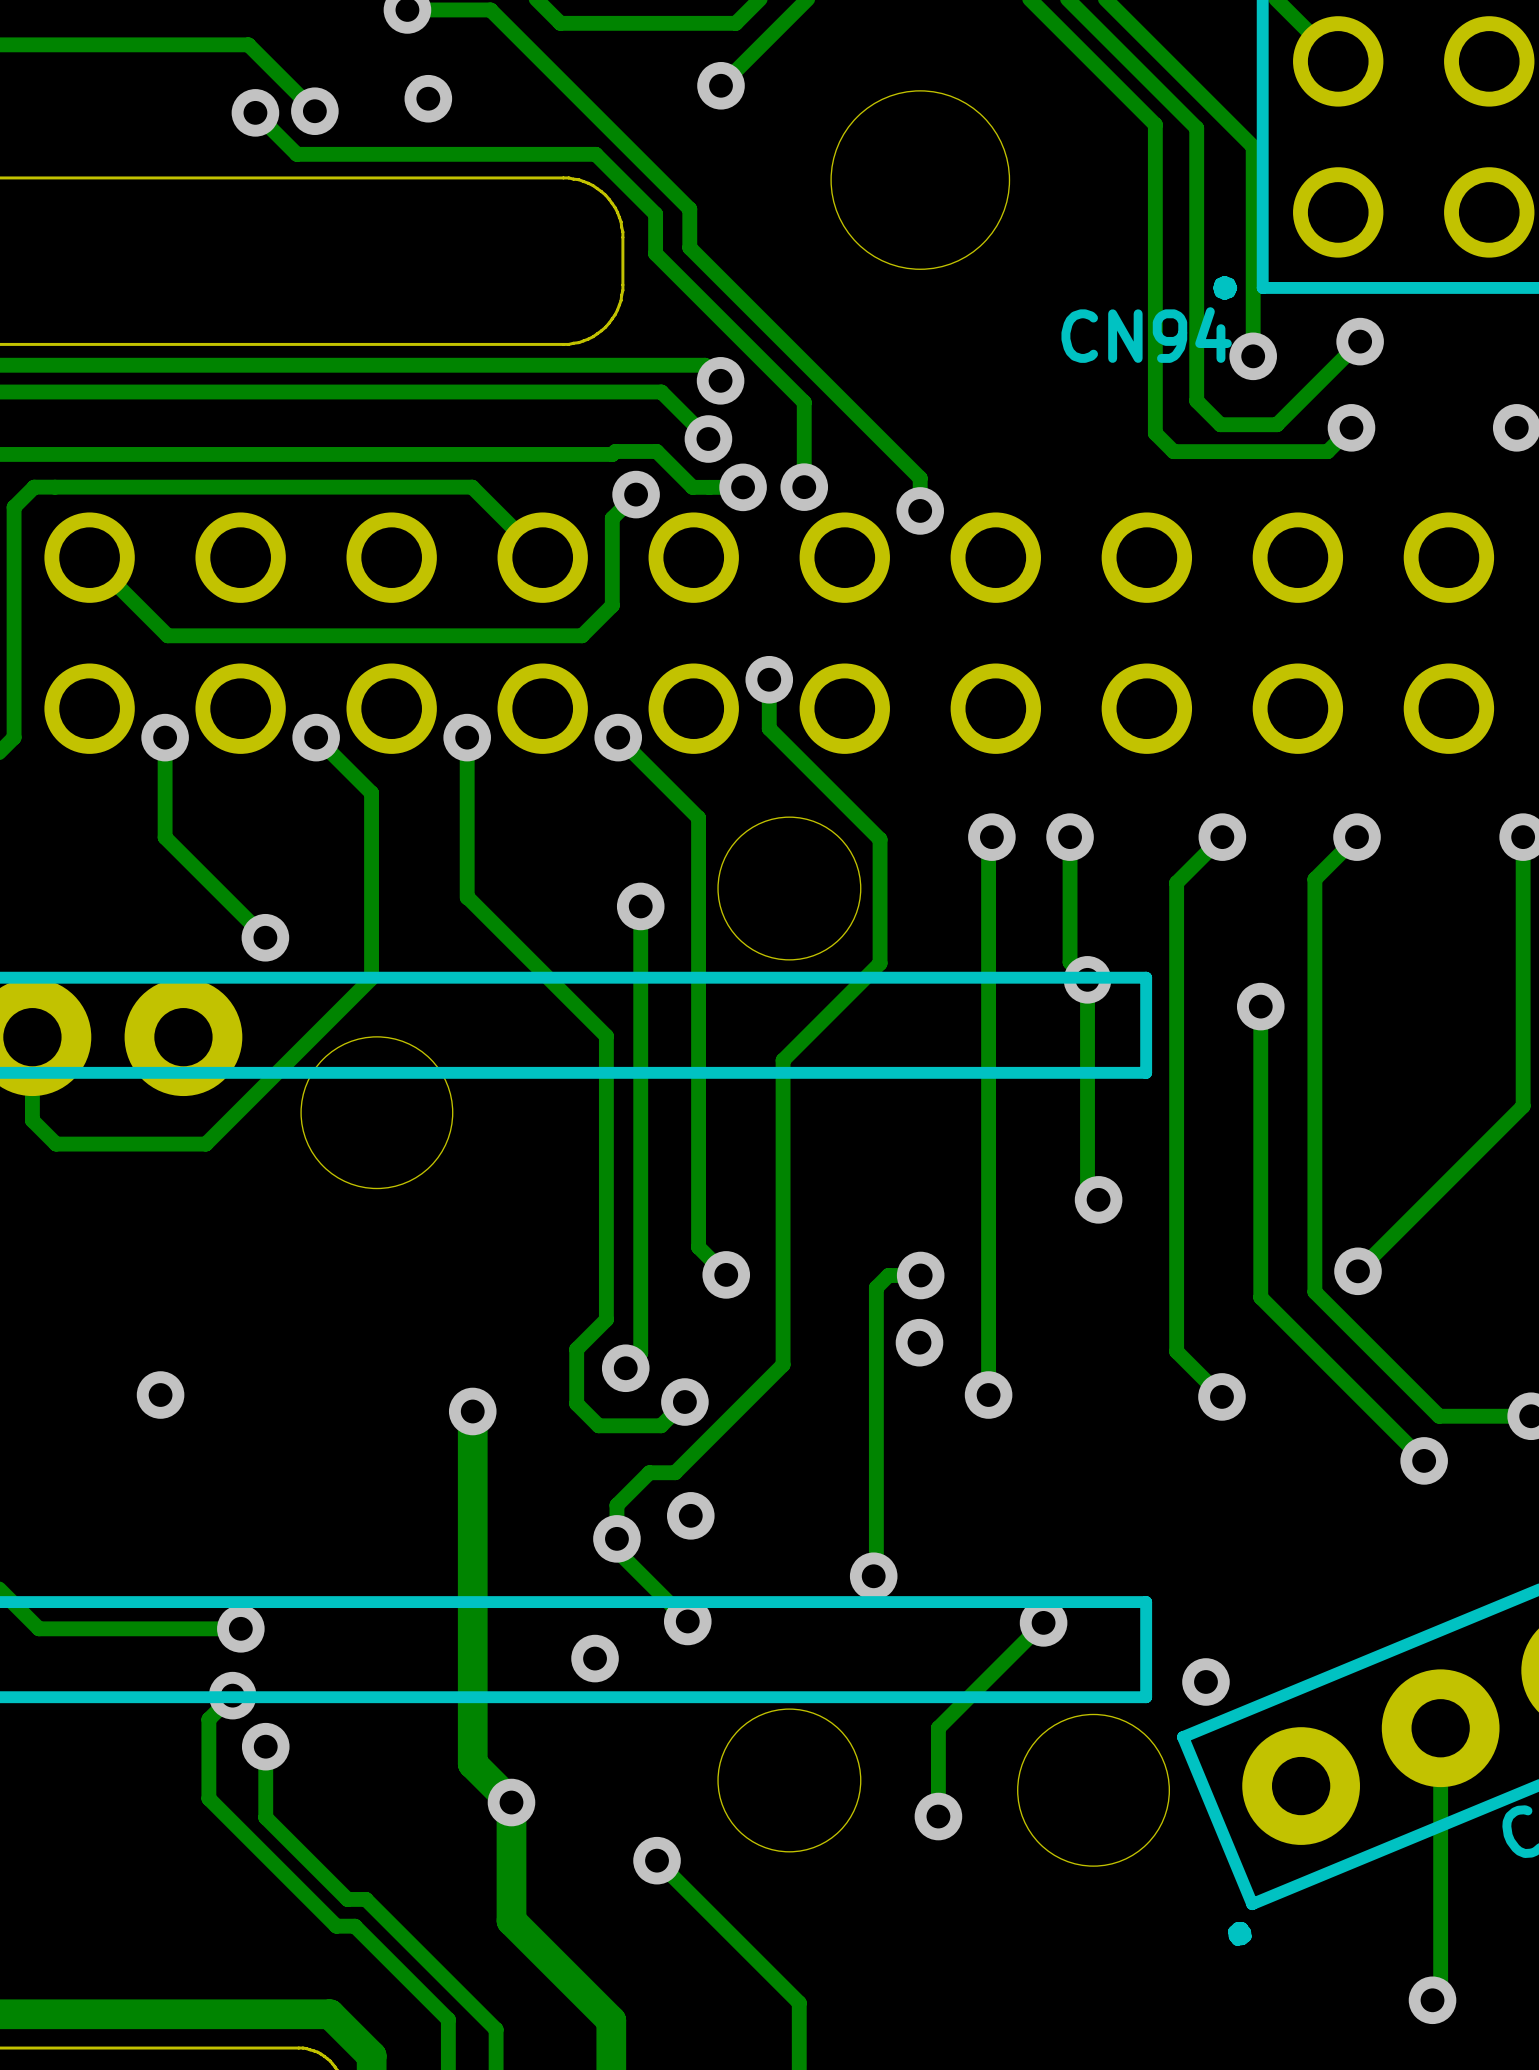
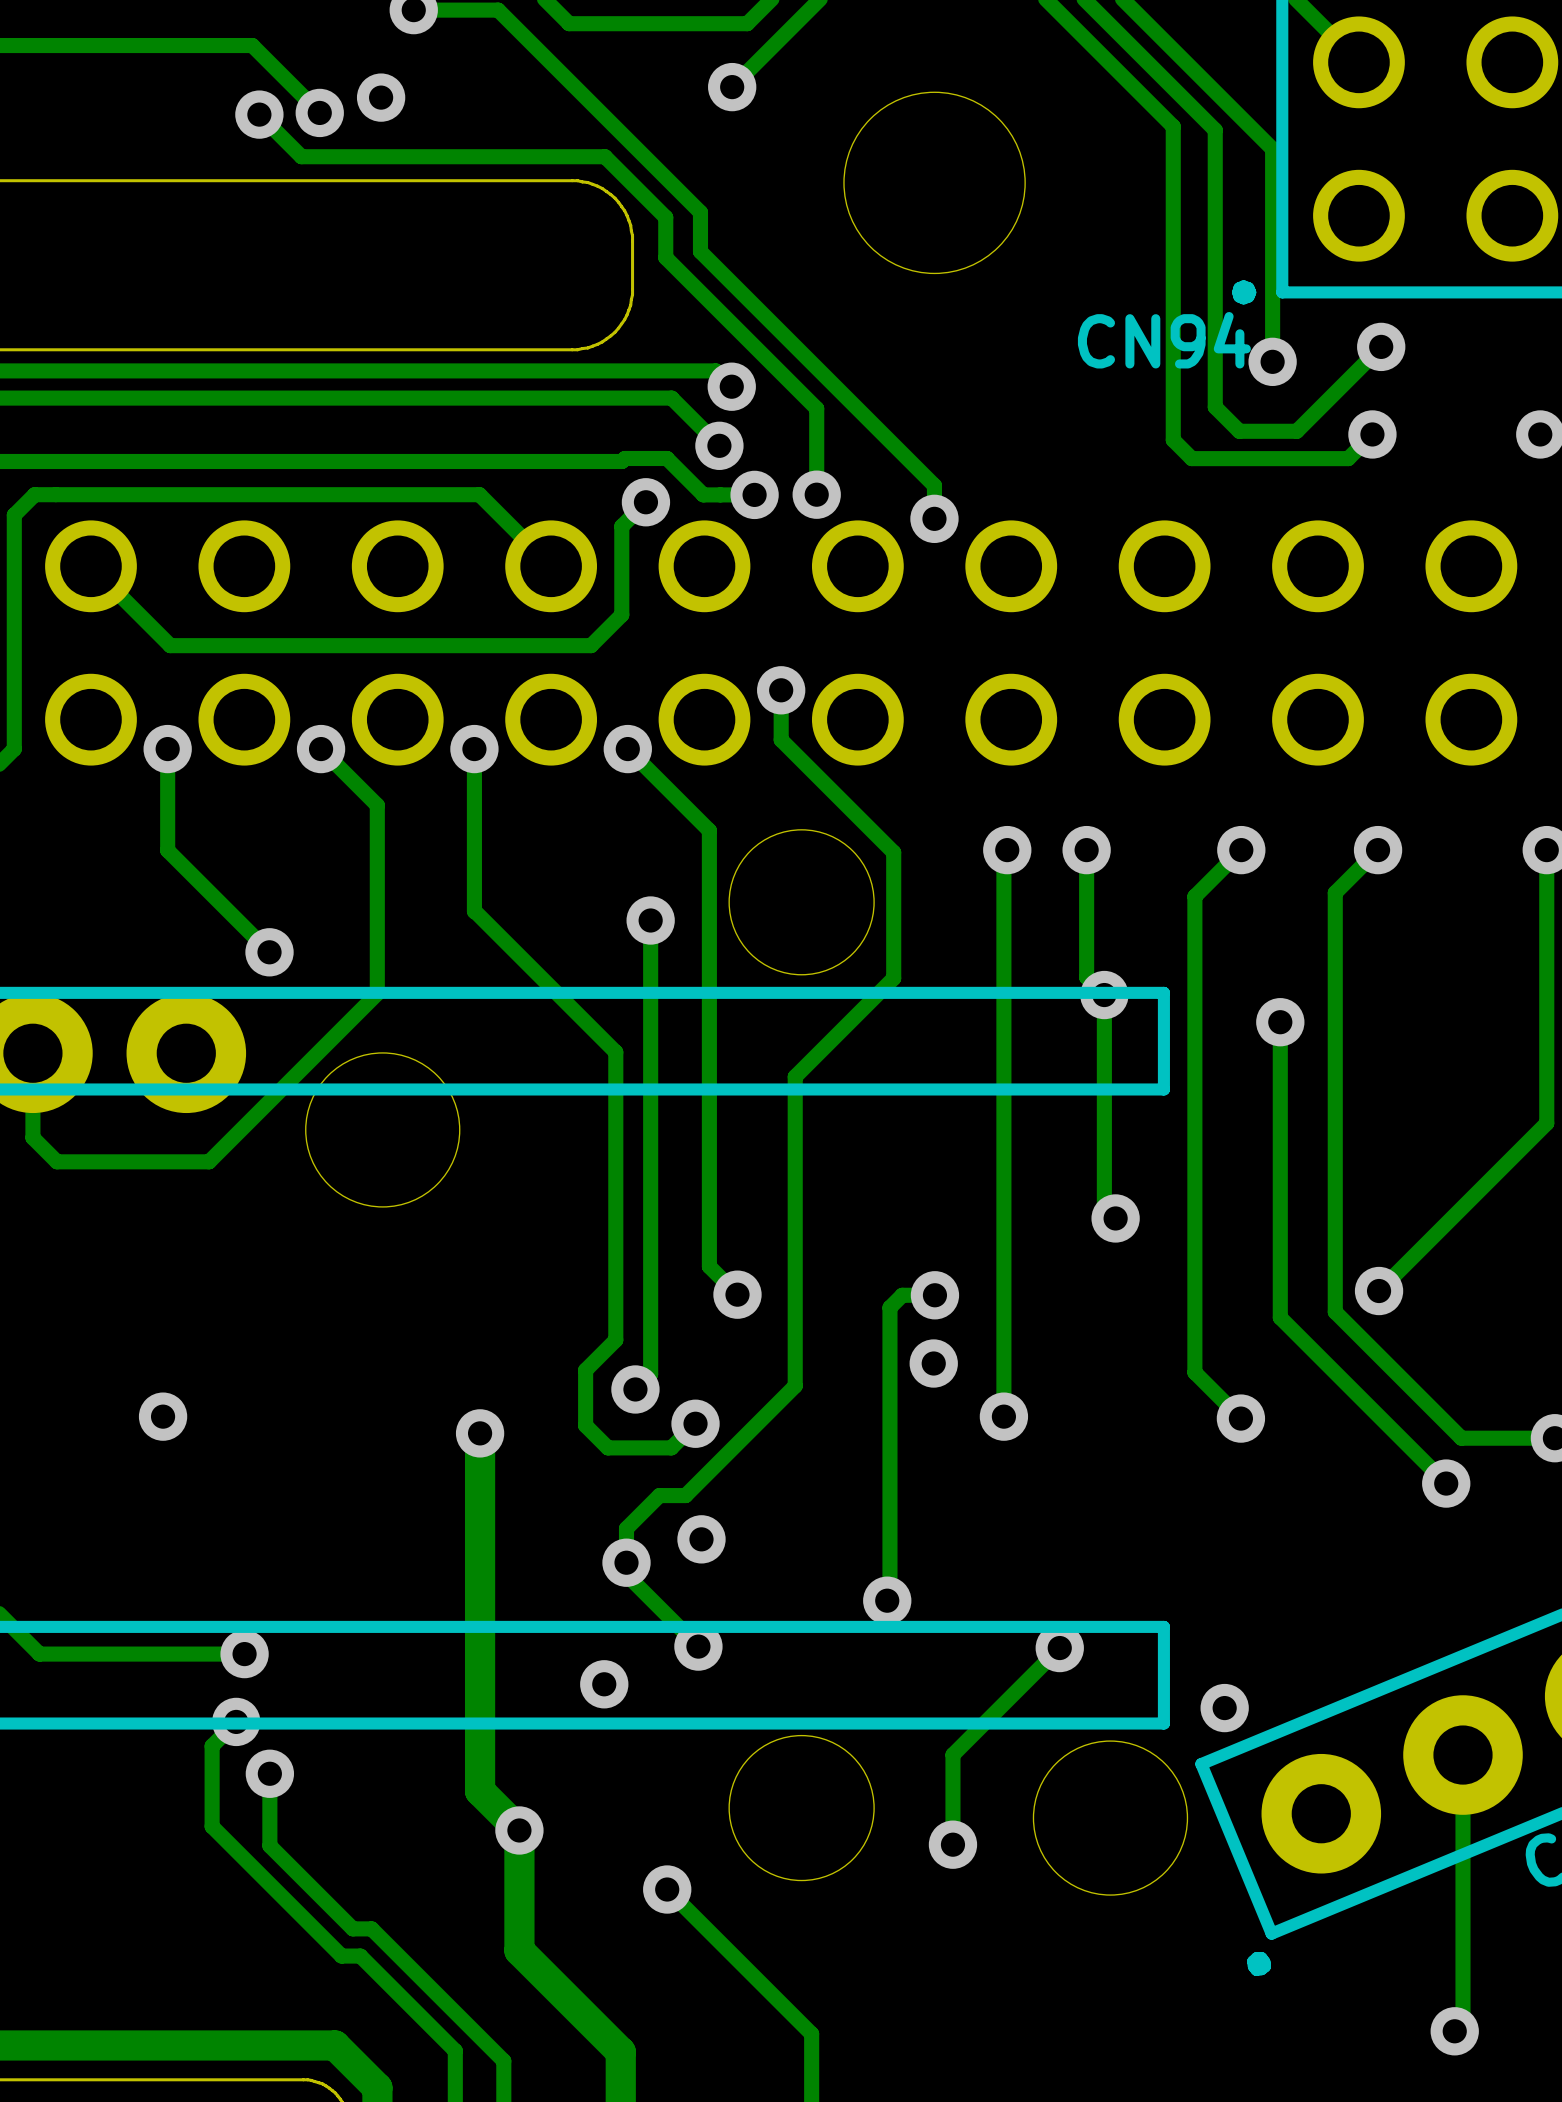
via position: (428, 98) -> (381, 97)

